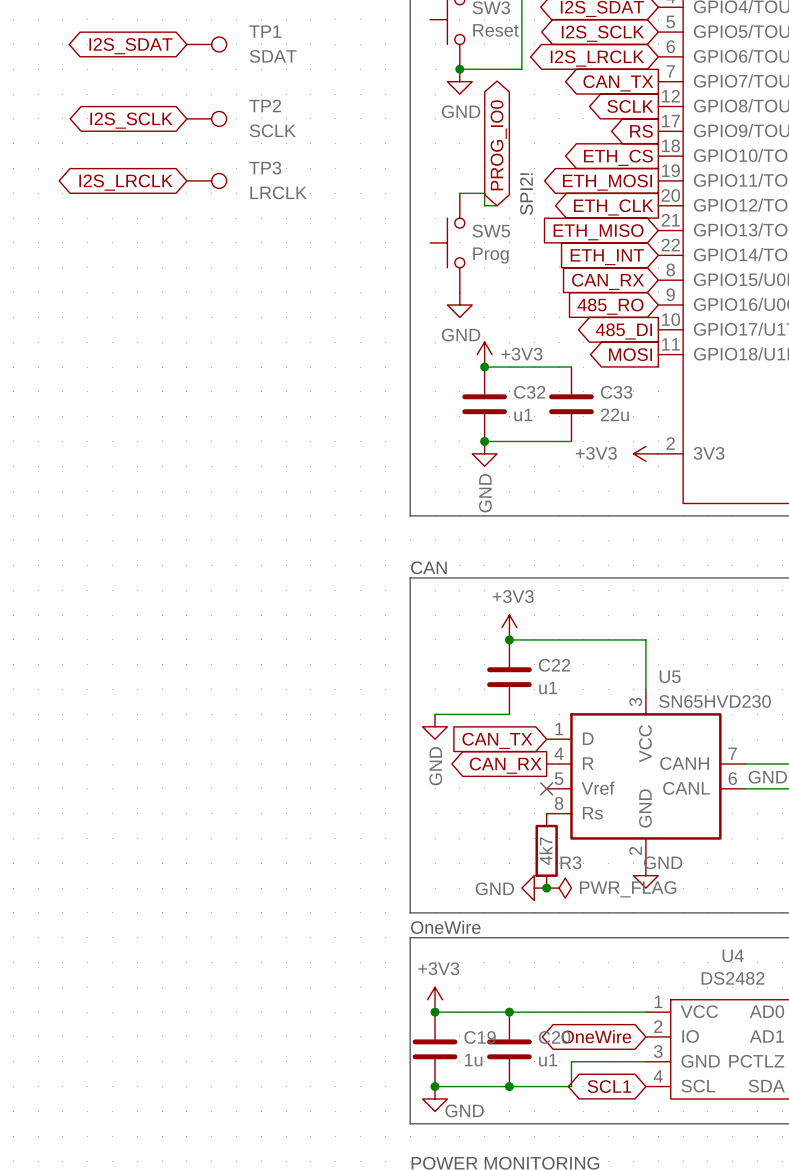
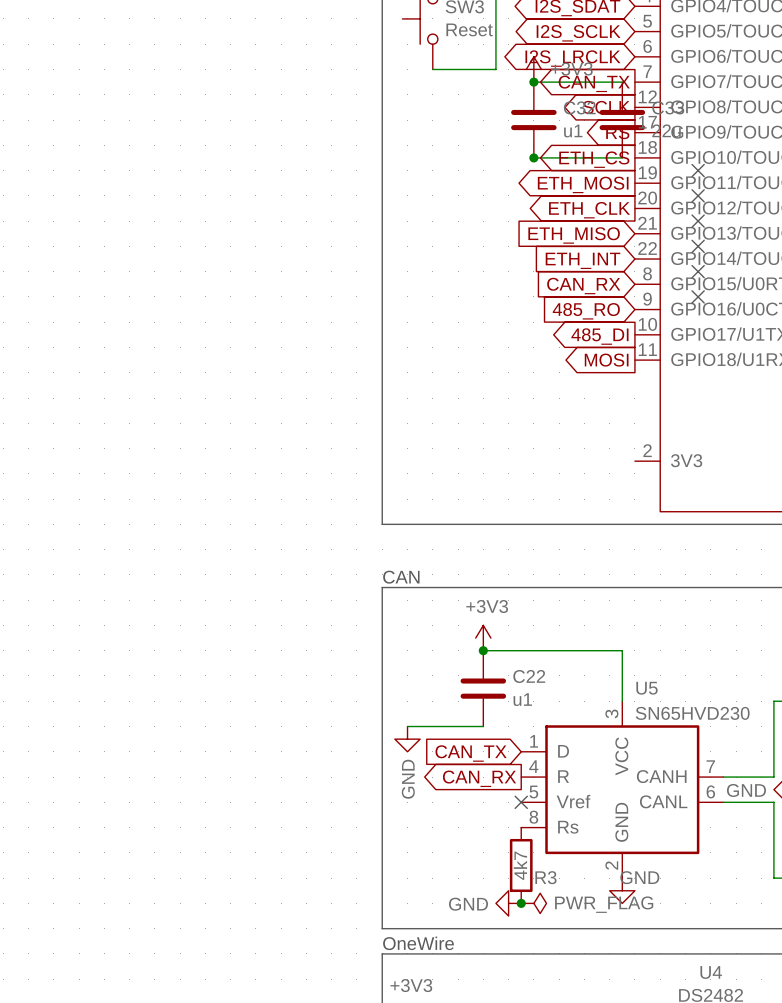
TP1: SDAT (206, 44) -> none
global label: I2S_SDAT (130, 46) -> none
junction: (459, 69) -> none
power symbol: none -> +3V3 (533, 69)
power symbol: GND (459, 81) -> none
wire: none -> (533, 82) (622, 82)
junction: none -> (533, 82)
TP2: SCLK (206, 118) -> none
global label: I2S_SCLK (131, 120) -> none
global label: PROG_IO0 (498, 145) -> none
junction: none -> (533, 157)
no-connect mark: none -> (698, 170)
TP3: LRCLK (206, 180) -> none
global label: I2S_LRCLK (126, 182) -> none
wire: (459, 193) (484, 193) (484, 205) (497, 205) -> none
no-connect mark: none -> (698, 195)
text: SPI2! (526, 194) -> none
no-connect mark: none -> (698, 221)
SW5: Prog (447, 242) -> none
no-connect mark: none -> (698, 246)
no-connect mark: none -> (698, 271)
no-connect mark: none -> (698, 296)
power symbol: GND (459, 304) -> none
power symbol: +3V3 (484, 354) -> none
wire: (484, 367) (571, 367) -> (533, 157) (622, 157)
junction: (484, 367) -> none
C32 position: (484, 404) -> (533, 120)
C33 position: (571, 404) -> (622, 120)
wire: (484, 441) (571, 441) -> none
junction: (484, 441) -> none
power symbol: GND (484, 453) -> none
power symbol: +3V3 (645, 453) -> none

